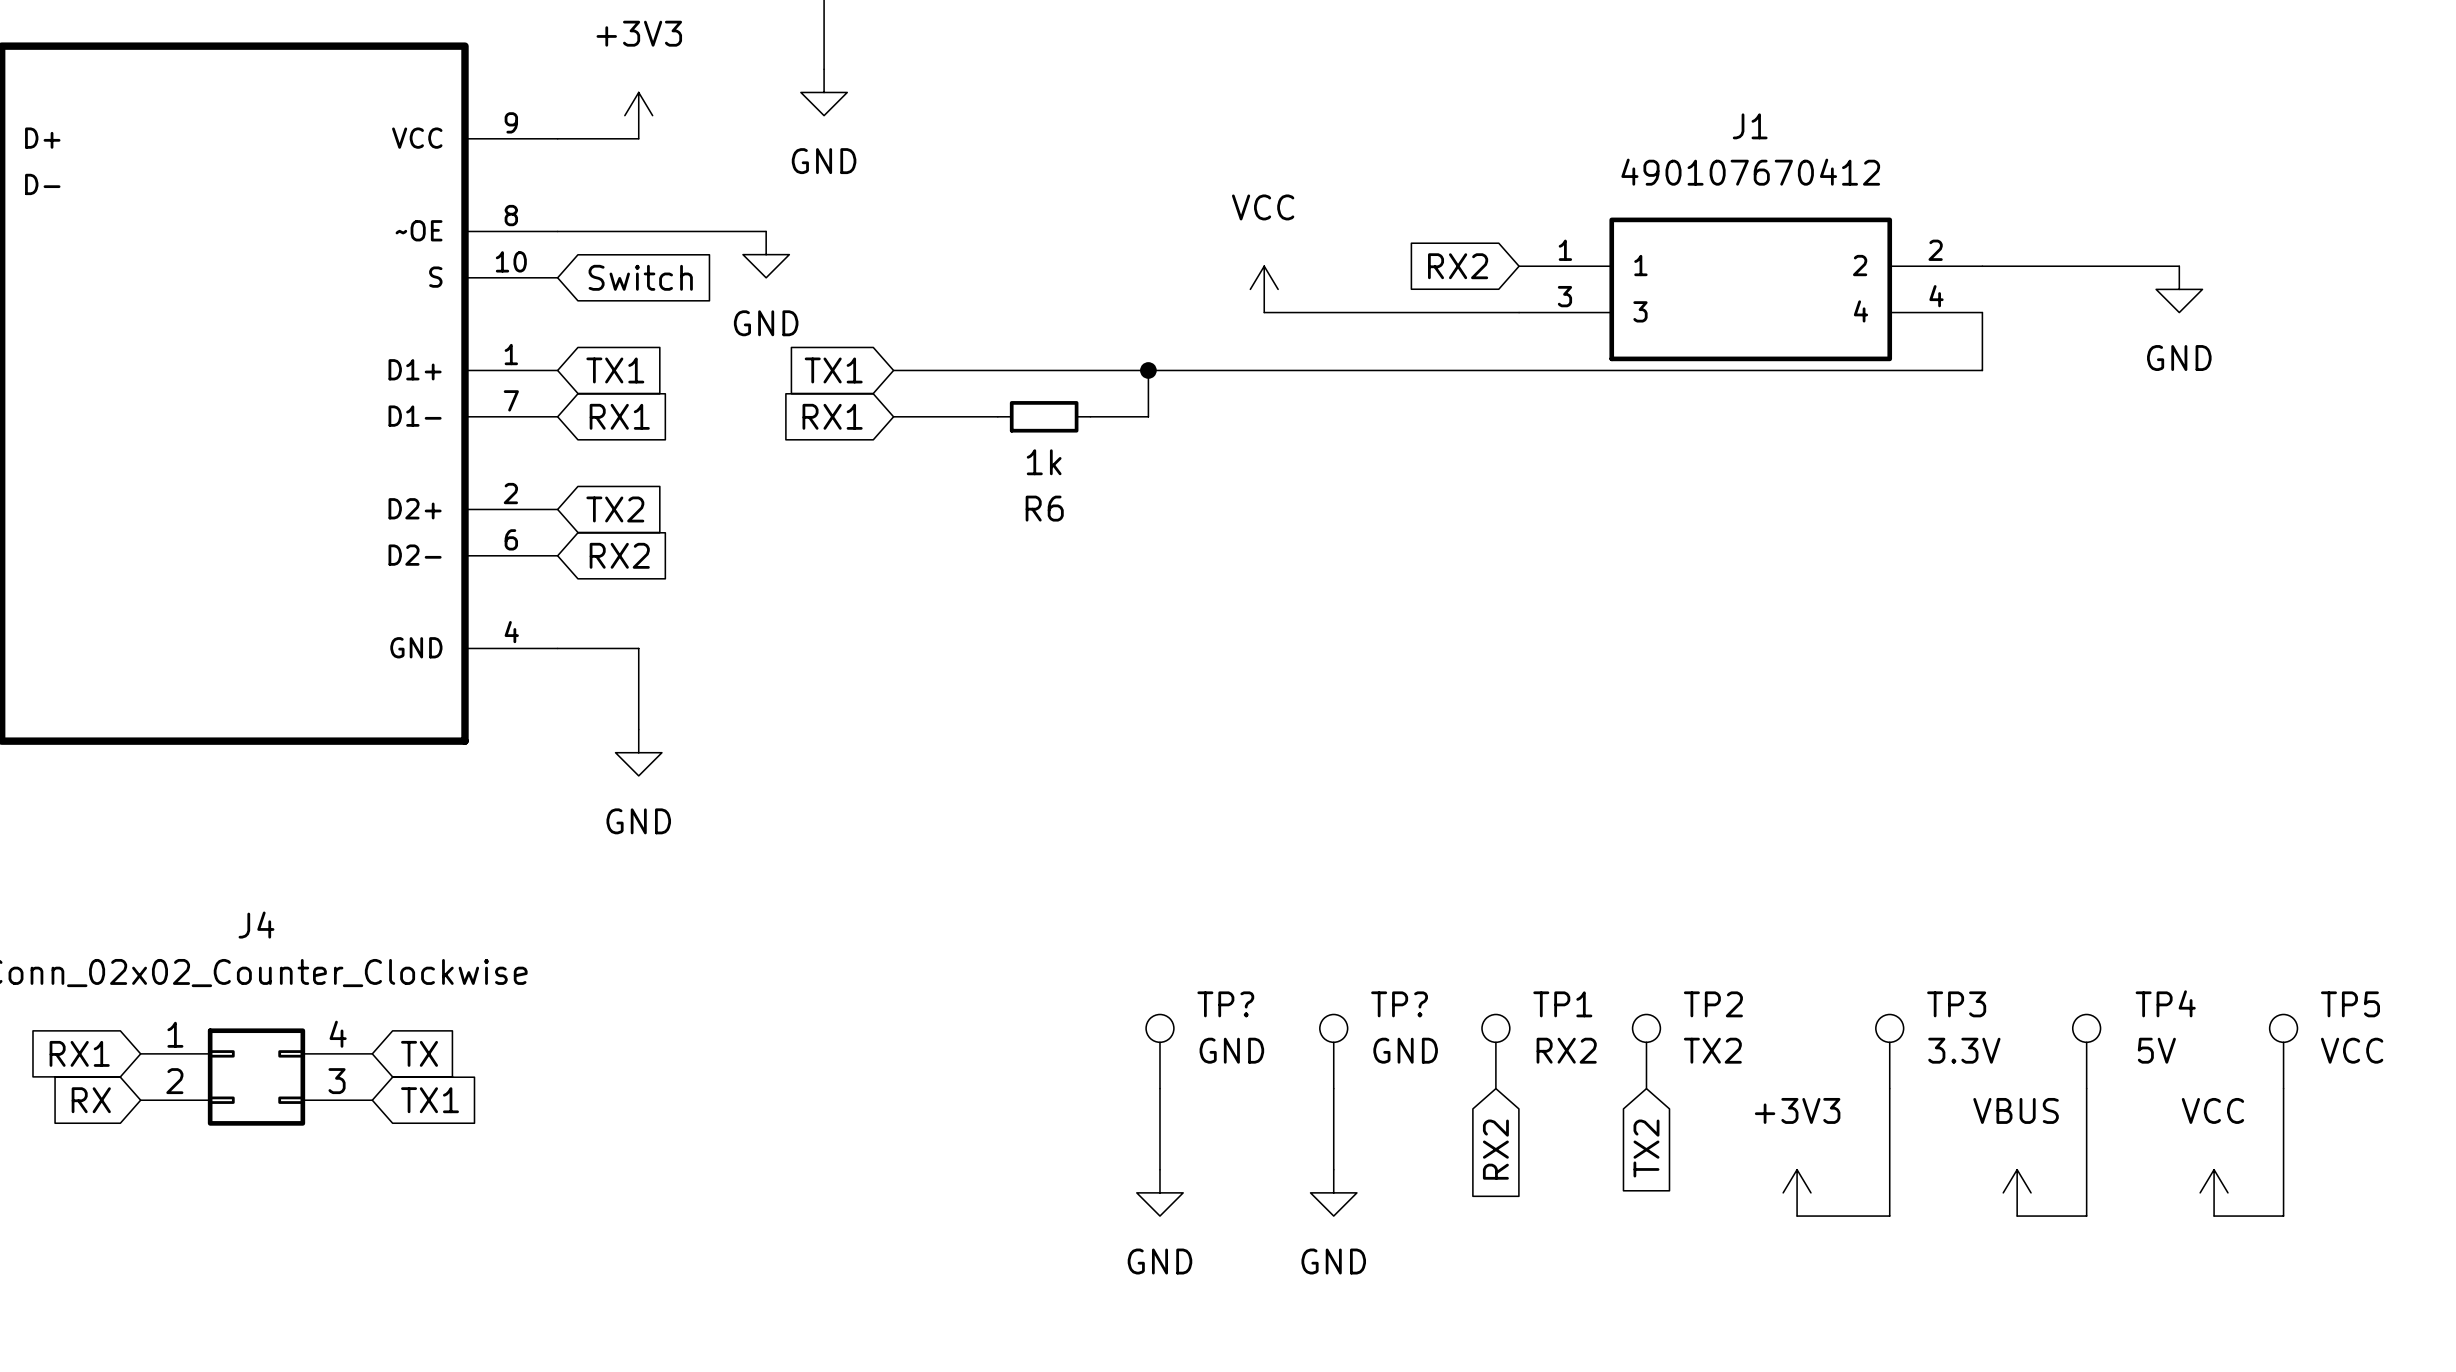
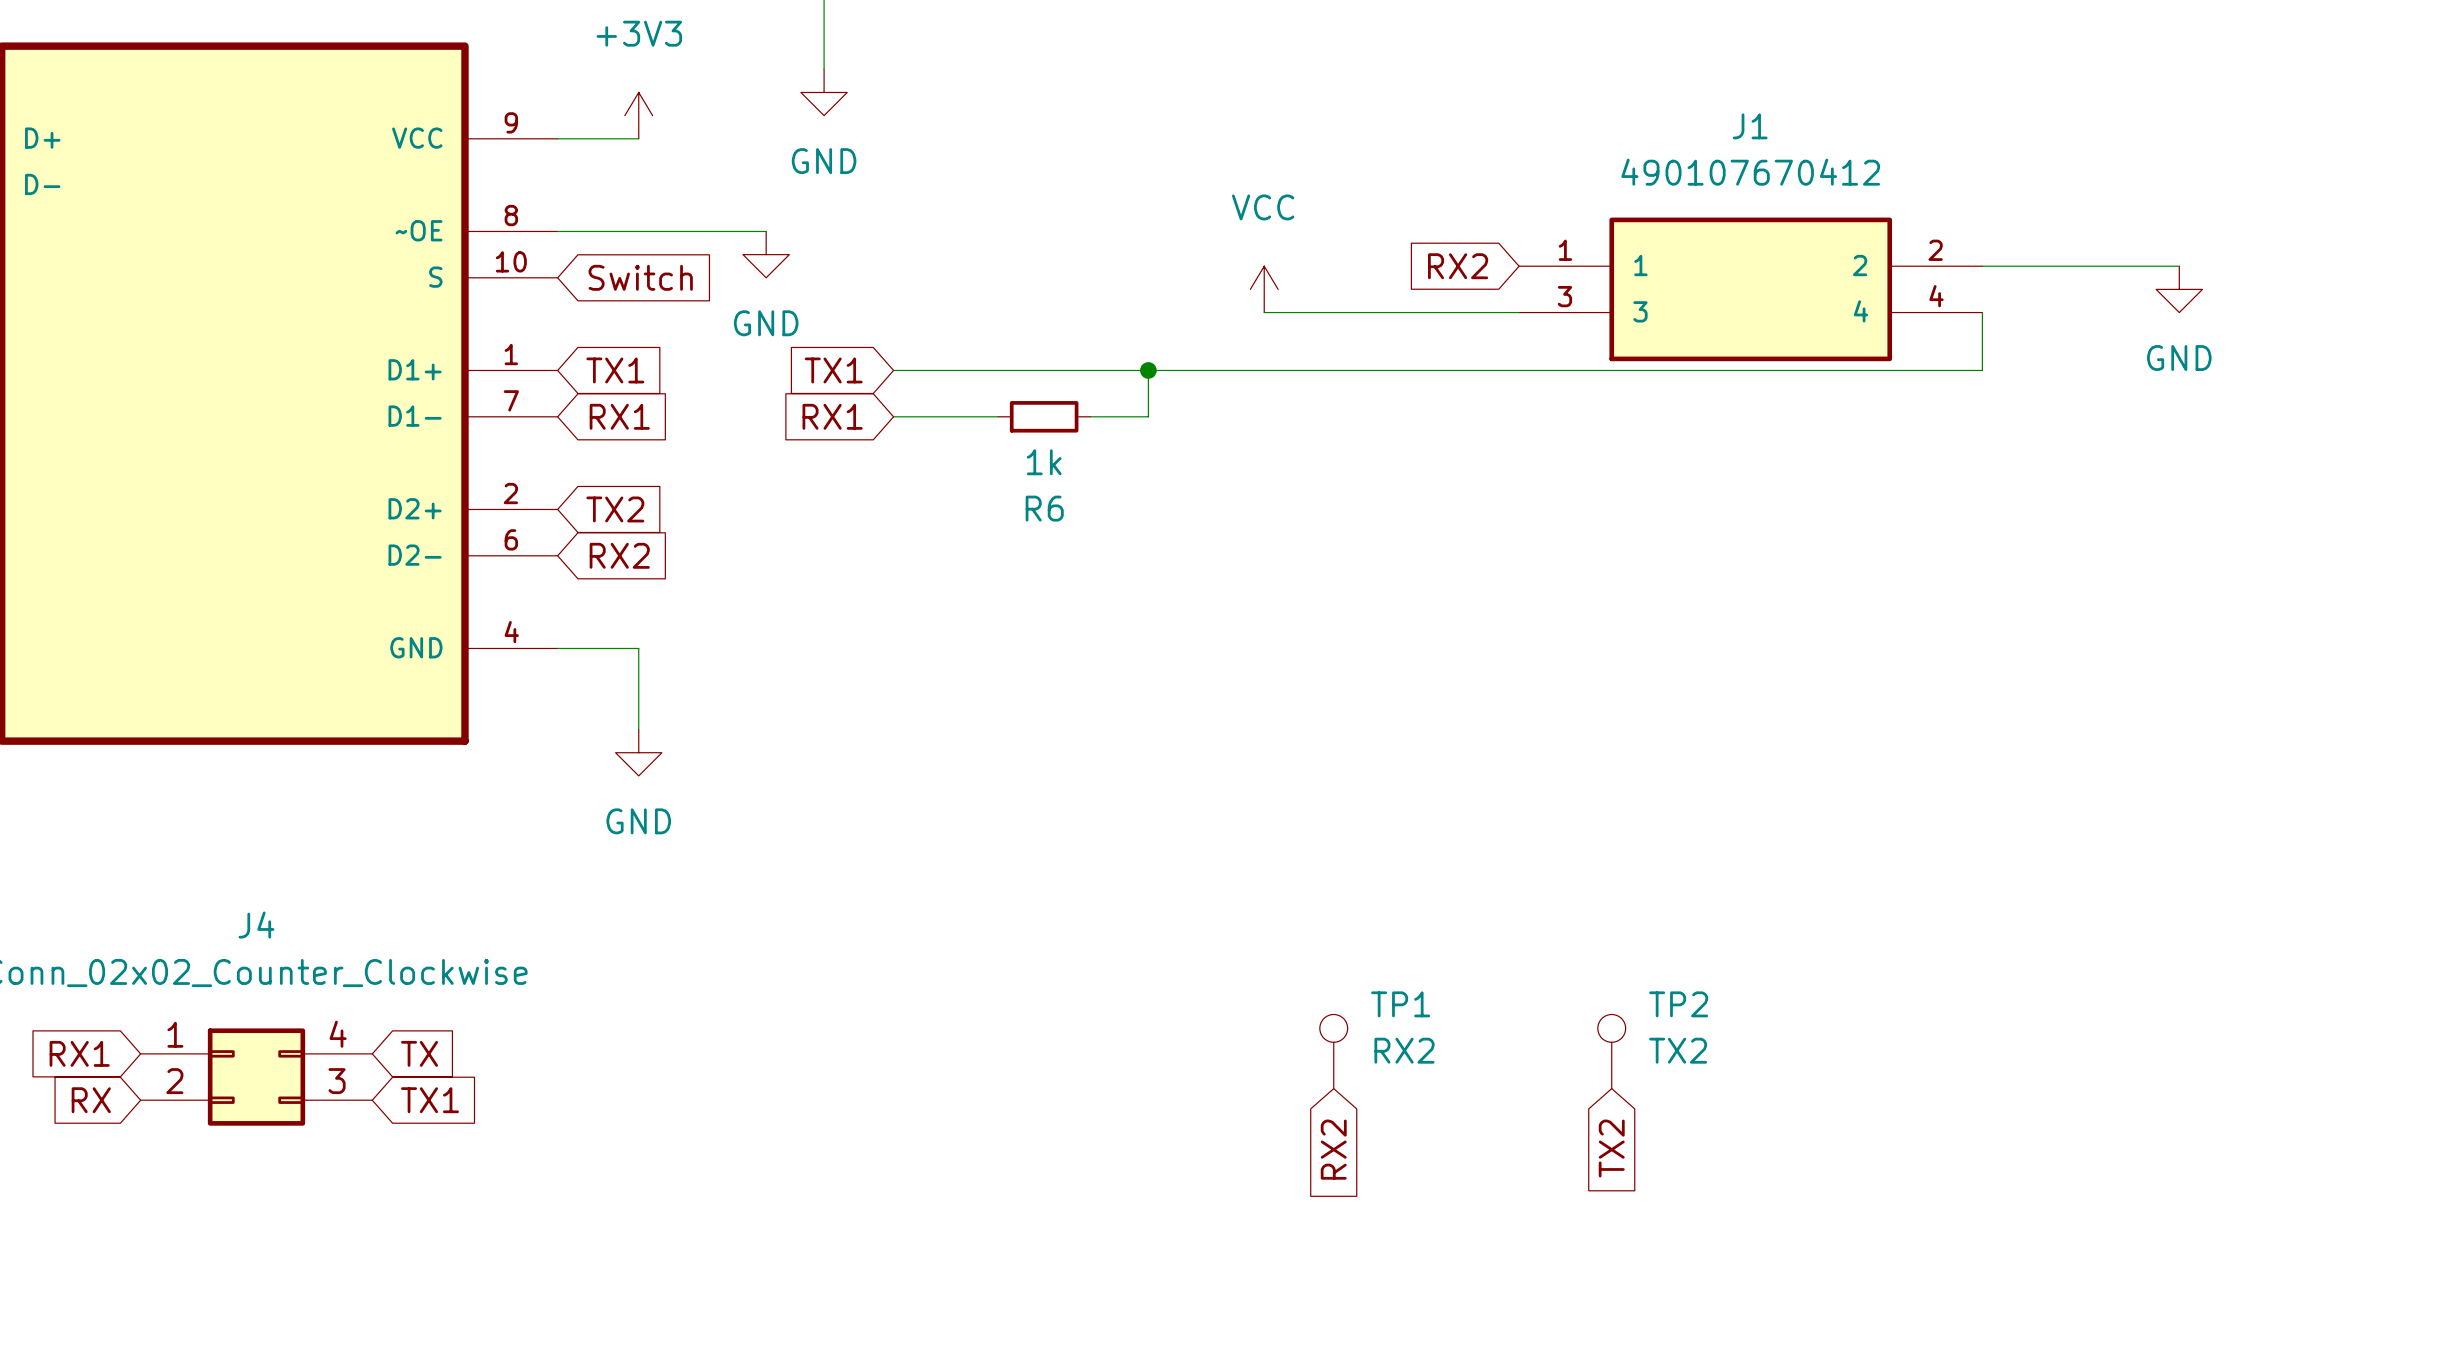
TP? name: TP? (1399, 1004) -> TP1 (1400, 1004)
TP? value: GND (1405, 1050) -> RX2 (1404, 1050)
TP?: GND (1159, 1051) -> none
TP1: RX2 (1495, 1051) -> none
TP2 position: (1646, 1051) -> (1611, 1051)
TP3: 3.3V (1889, 1051) -> none
TP4: 5V (2086, 1051) -> none
TP5: VCC (2283, 1051) -> none
wire: (1159, 1088) (1159, 1169) -> none
wire: (1333, 1088) (1333, 1169) -> none
wire: (1889, 1088) (1889, 1216) (1797, 1216) -> none
wire: (2086, 1088) (2086, 1216) (2017, 1216) -> none
wire: (2283, 1088) (2283, 1216) (2214, 1216) -> none
global label position: TX2 (1646, 1148) -> TX2 (1611, 1148)
global label position: RX2 (1495, 1149) -> RX2 (1333, 1149)
power symbol: GND (1159, 1192) -> none
power symbol: GND (1333, 1192) -> none
power symbol: +3V3 (1797, 1192) -> none
power symbol: VBUS (2017, 1192) -> none
power symbol: VCC (2214, 1192) -> none

